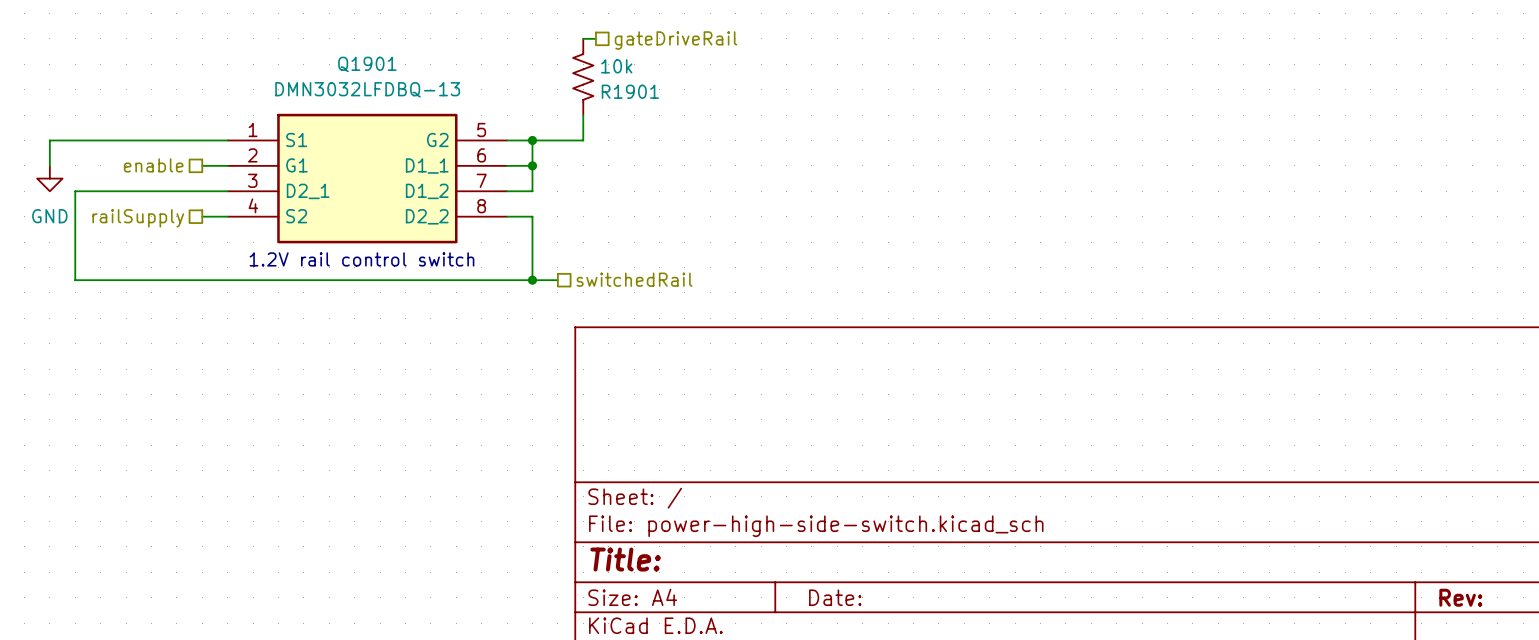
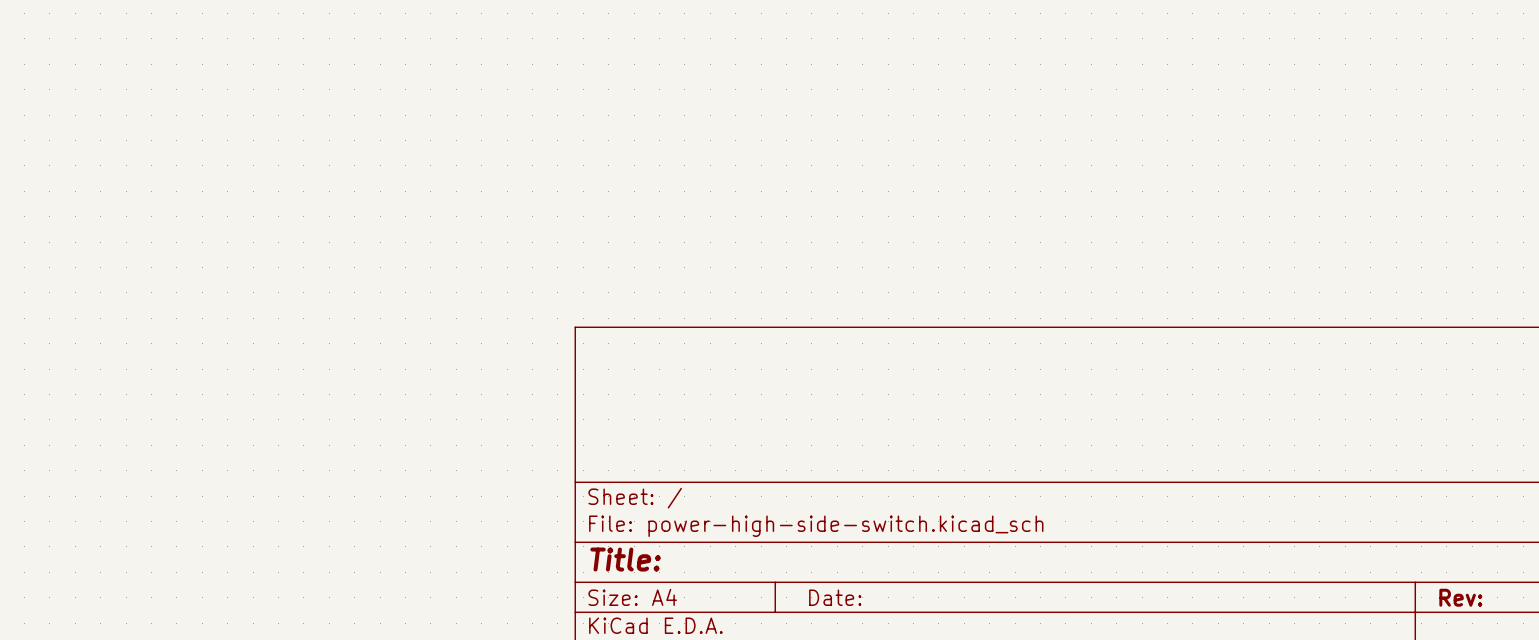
wire: (583, 38) (595, 38) -> none
hierarchical label: gateDriveRail (676, 40) -> none
R1901: 10k (583, 76) -> none
wire: (583, 115) (583, 140) (507, 140) -> none
wire: (227, 140) (49, 140) (49, 165) -> none
wire: (532, 140) (532, 191) (507, 191) -> none
junction: (532, 140) -> none
hierarchical label: enable (153, 165) -> none
wire: (202, 165) (227, 165) -> none
wire: (507, 165) (532, 165) -> none
junction: (532, 165) -> none
power symbol: GND (49, 178) -> none
Q1901: DMN3032LFDBQ-13 (367, 178) -> none
wire: (227, 191) (75, 191) (75, 280) (557, 280) -> none
wire: (202, 216) (227, 216) -> none
wire: (507, 216) (532, 216) (532, 280) -> none
hierarchical label: railSupply (138, 218) -> none
text: 1.2V rail control switch (361, 259) -> none
hierarchical label: switchedRail (634, 279) -> none
junction: (532, 280) -> none

